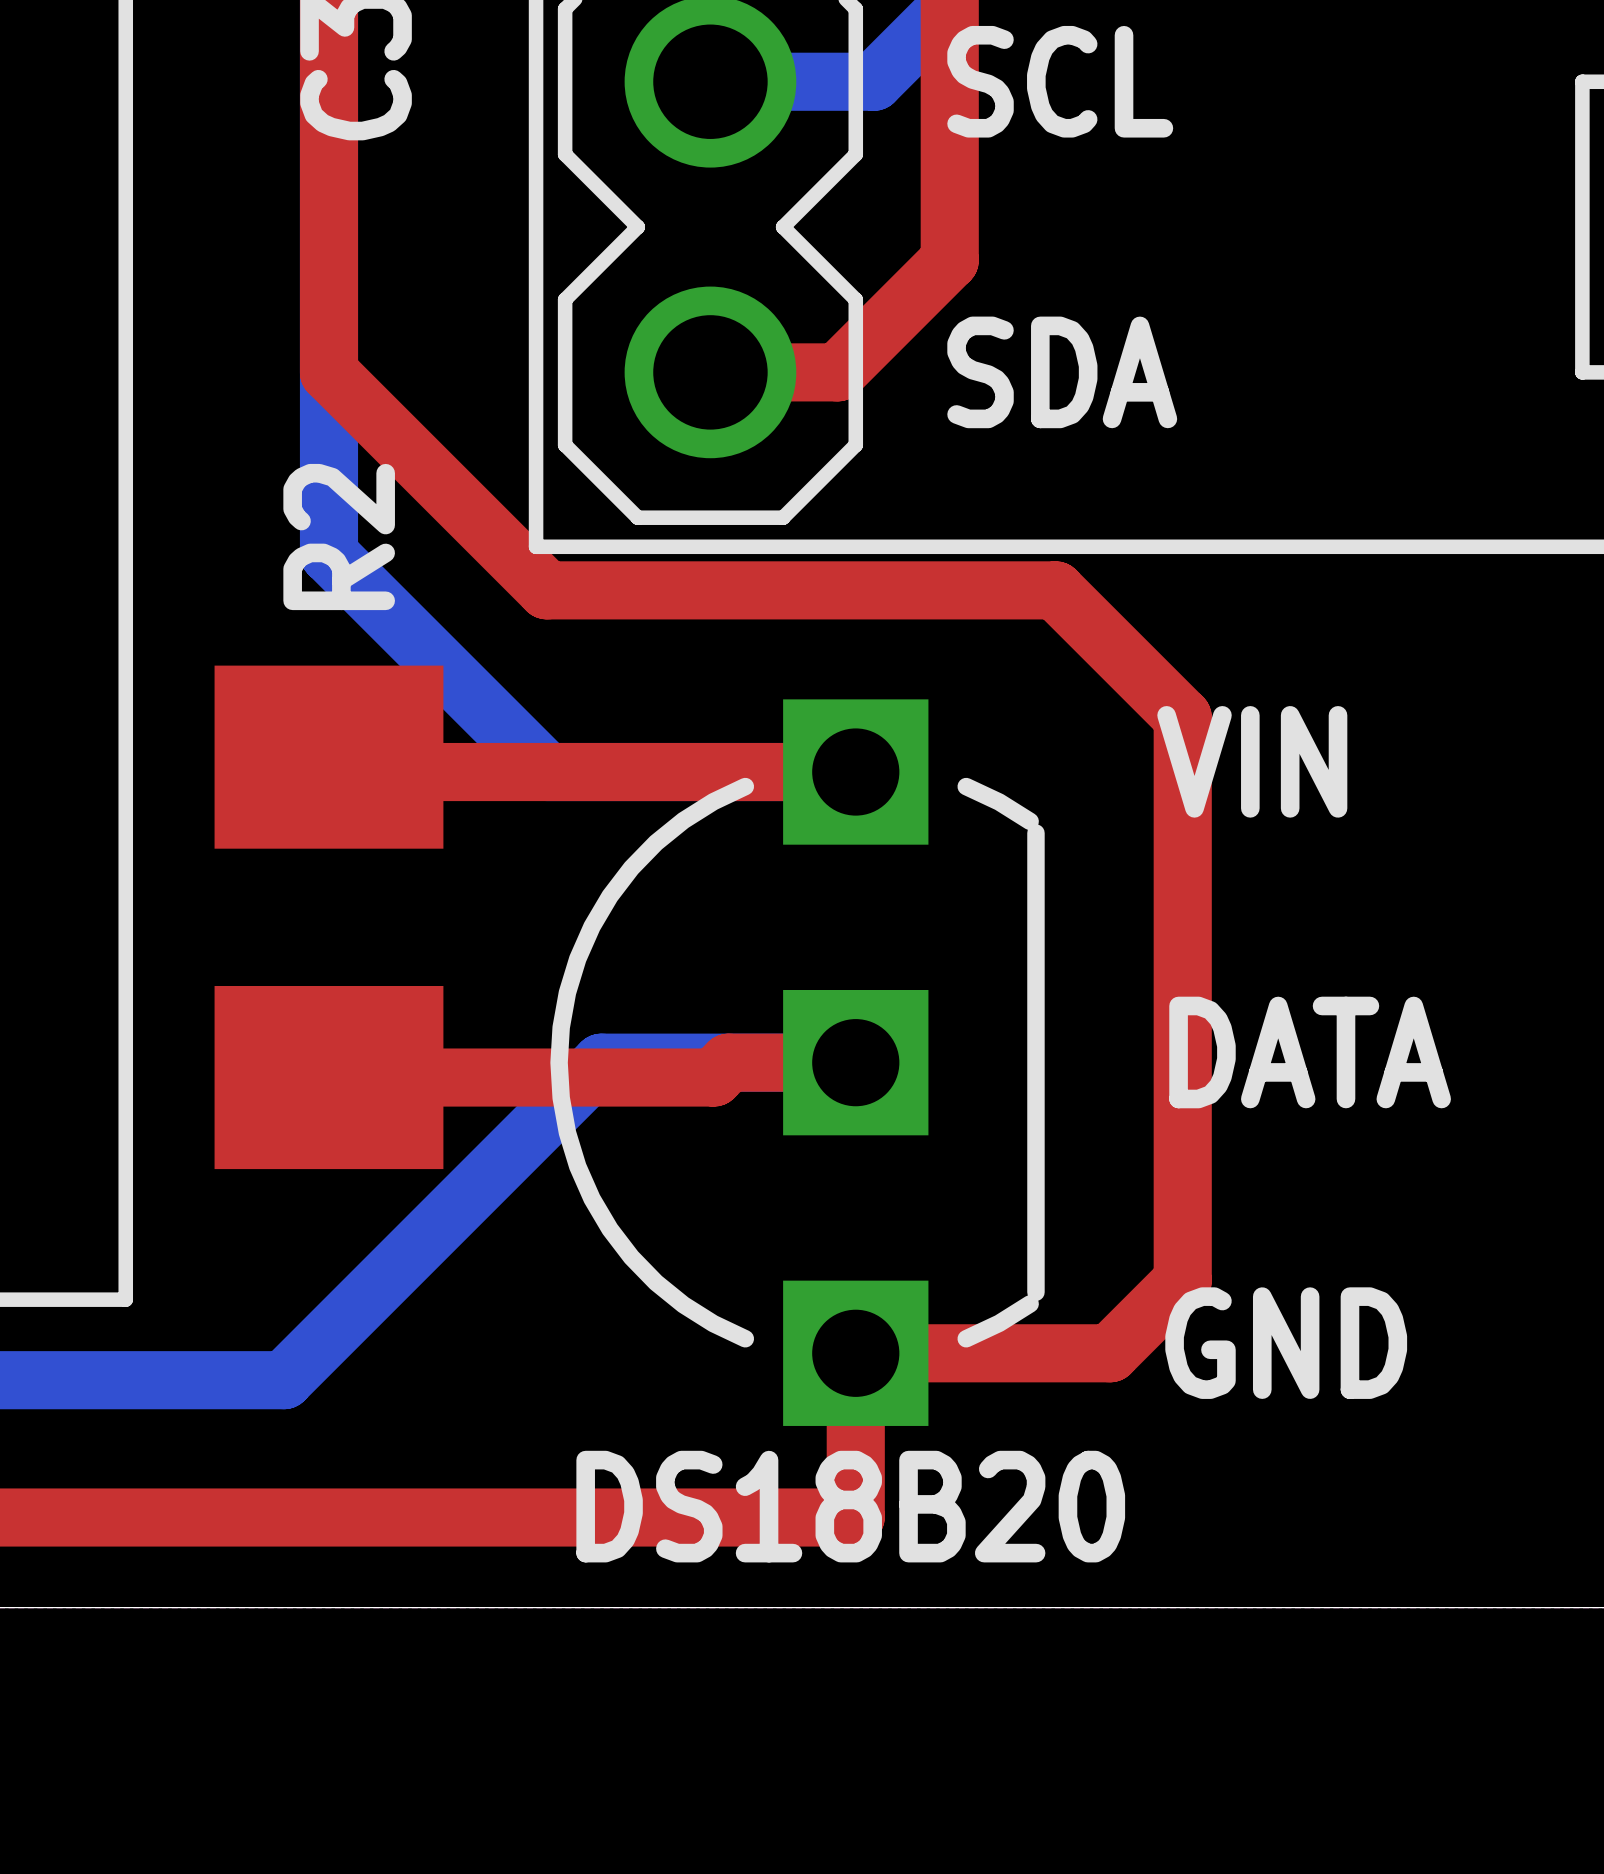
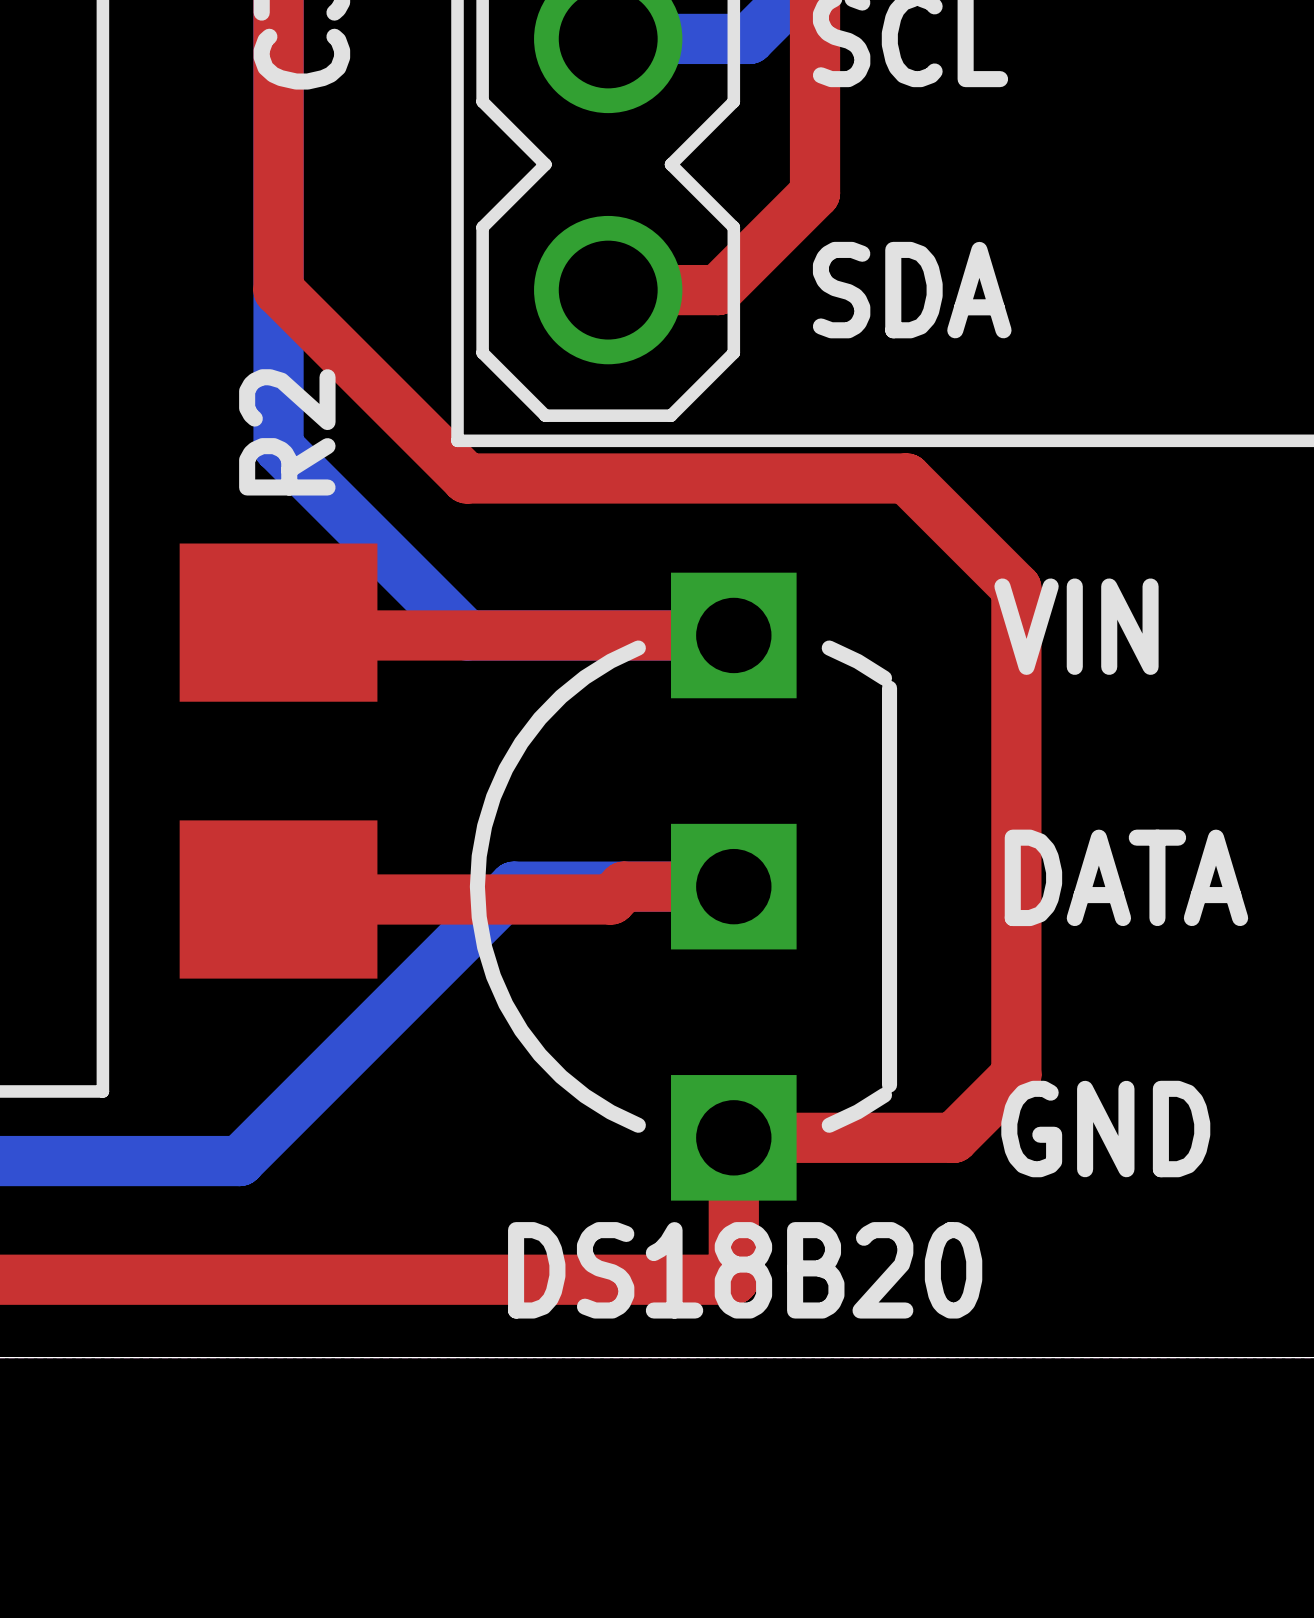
DS18B20 name position: DS18B20 (850, 1506) -> DS18B20 (745, 1270)

